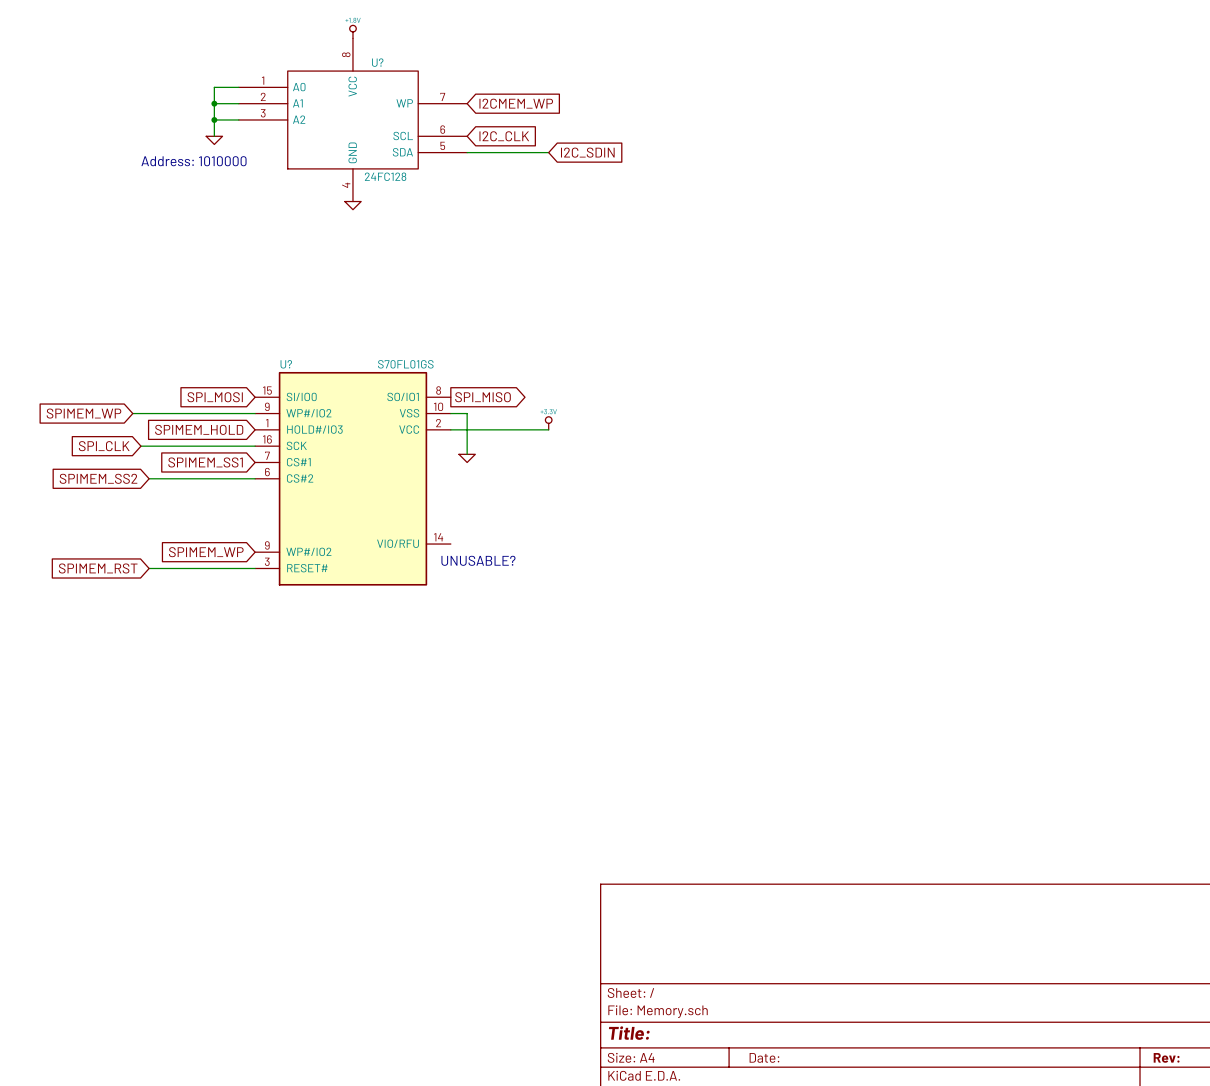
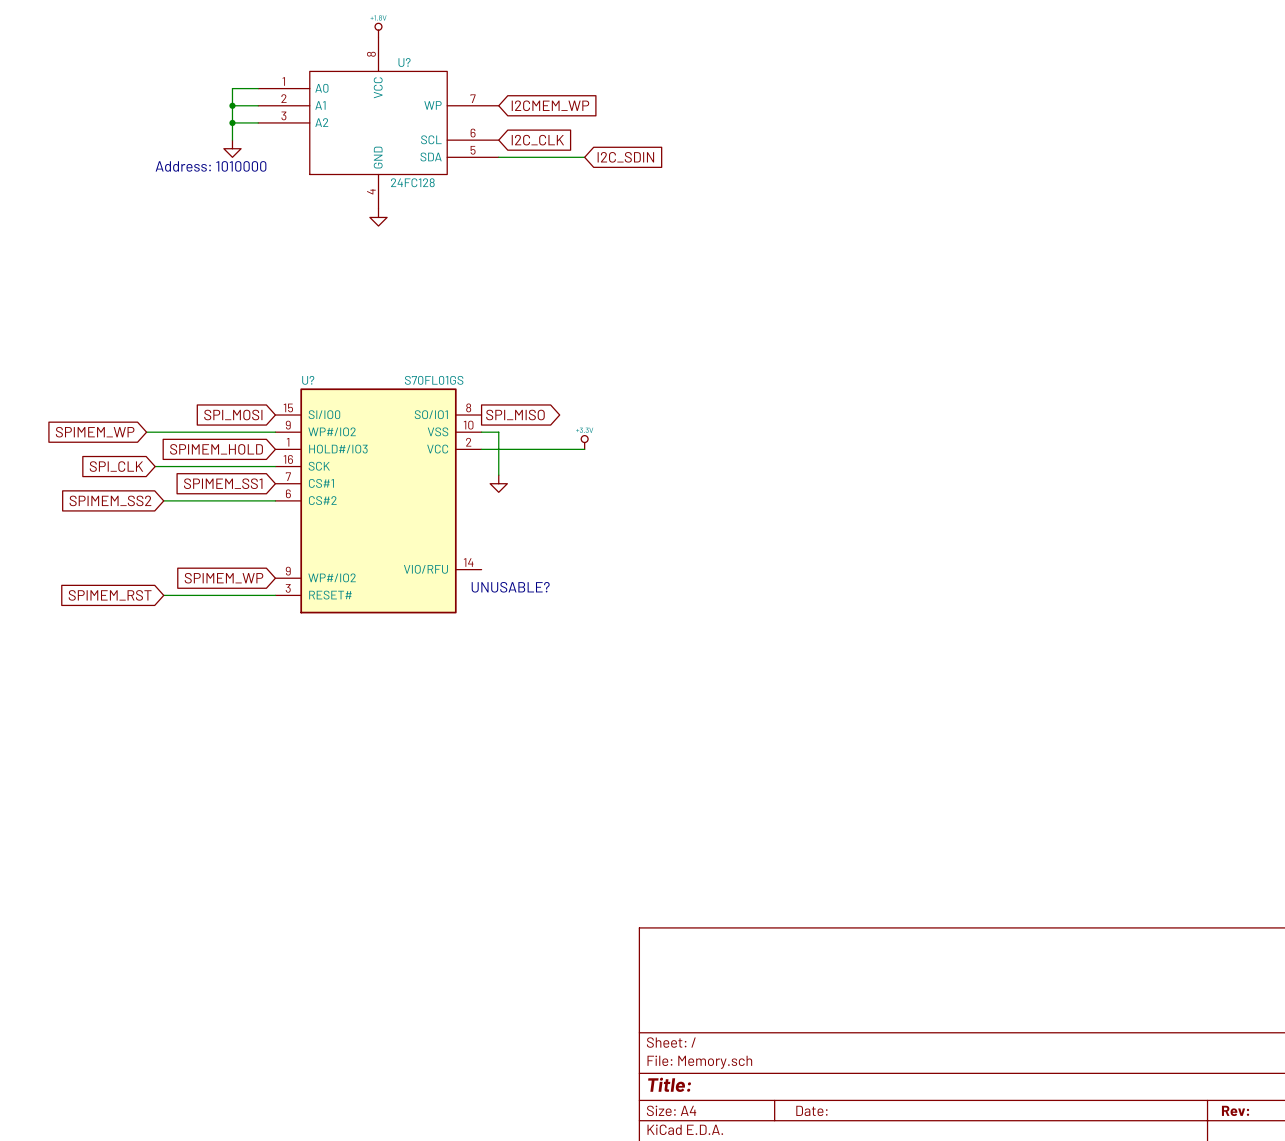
power symbol shape: [206, 136, 223, 145] -> [223, 140, 242, 158]
power symbol shape: [344, 201, 362, 210] -> [369, 208, 388, 227]
power symbol shape: [458, 454, 476, 463] -> [490, 475, 508, 493]

